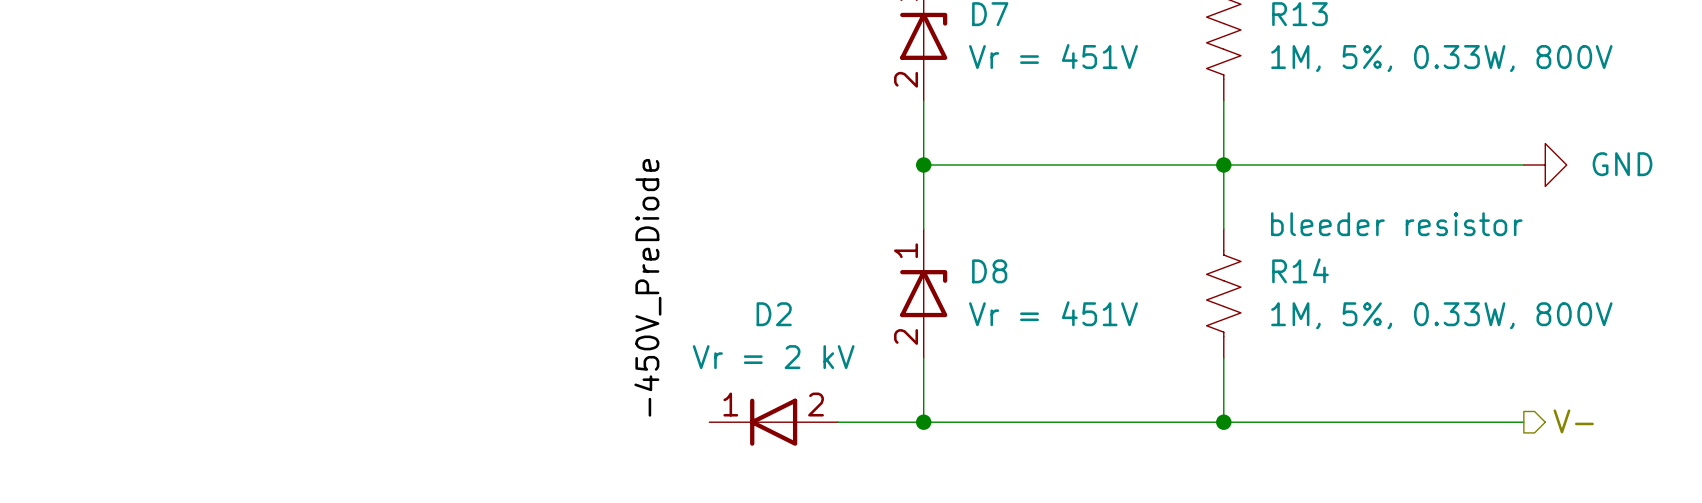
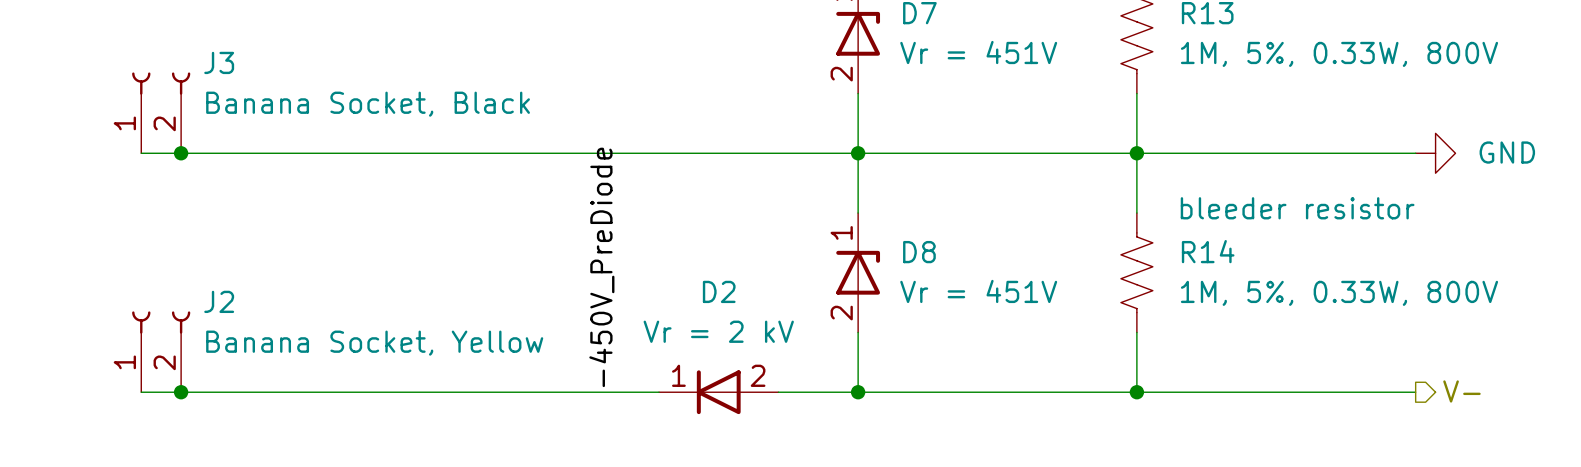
J3: none -> Banana Socket, Black (161, 112)
wire: none -> (141, 153) (858, 153)
junction: none -> (181, 153)
J2: none -> Banana Socket, Yellow (161, 351)
wire: none -> (141, 392) (659, 392)
junction: none -> (181, 392)

